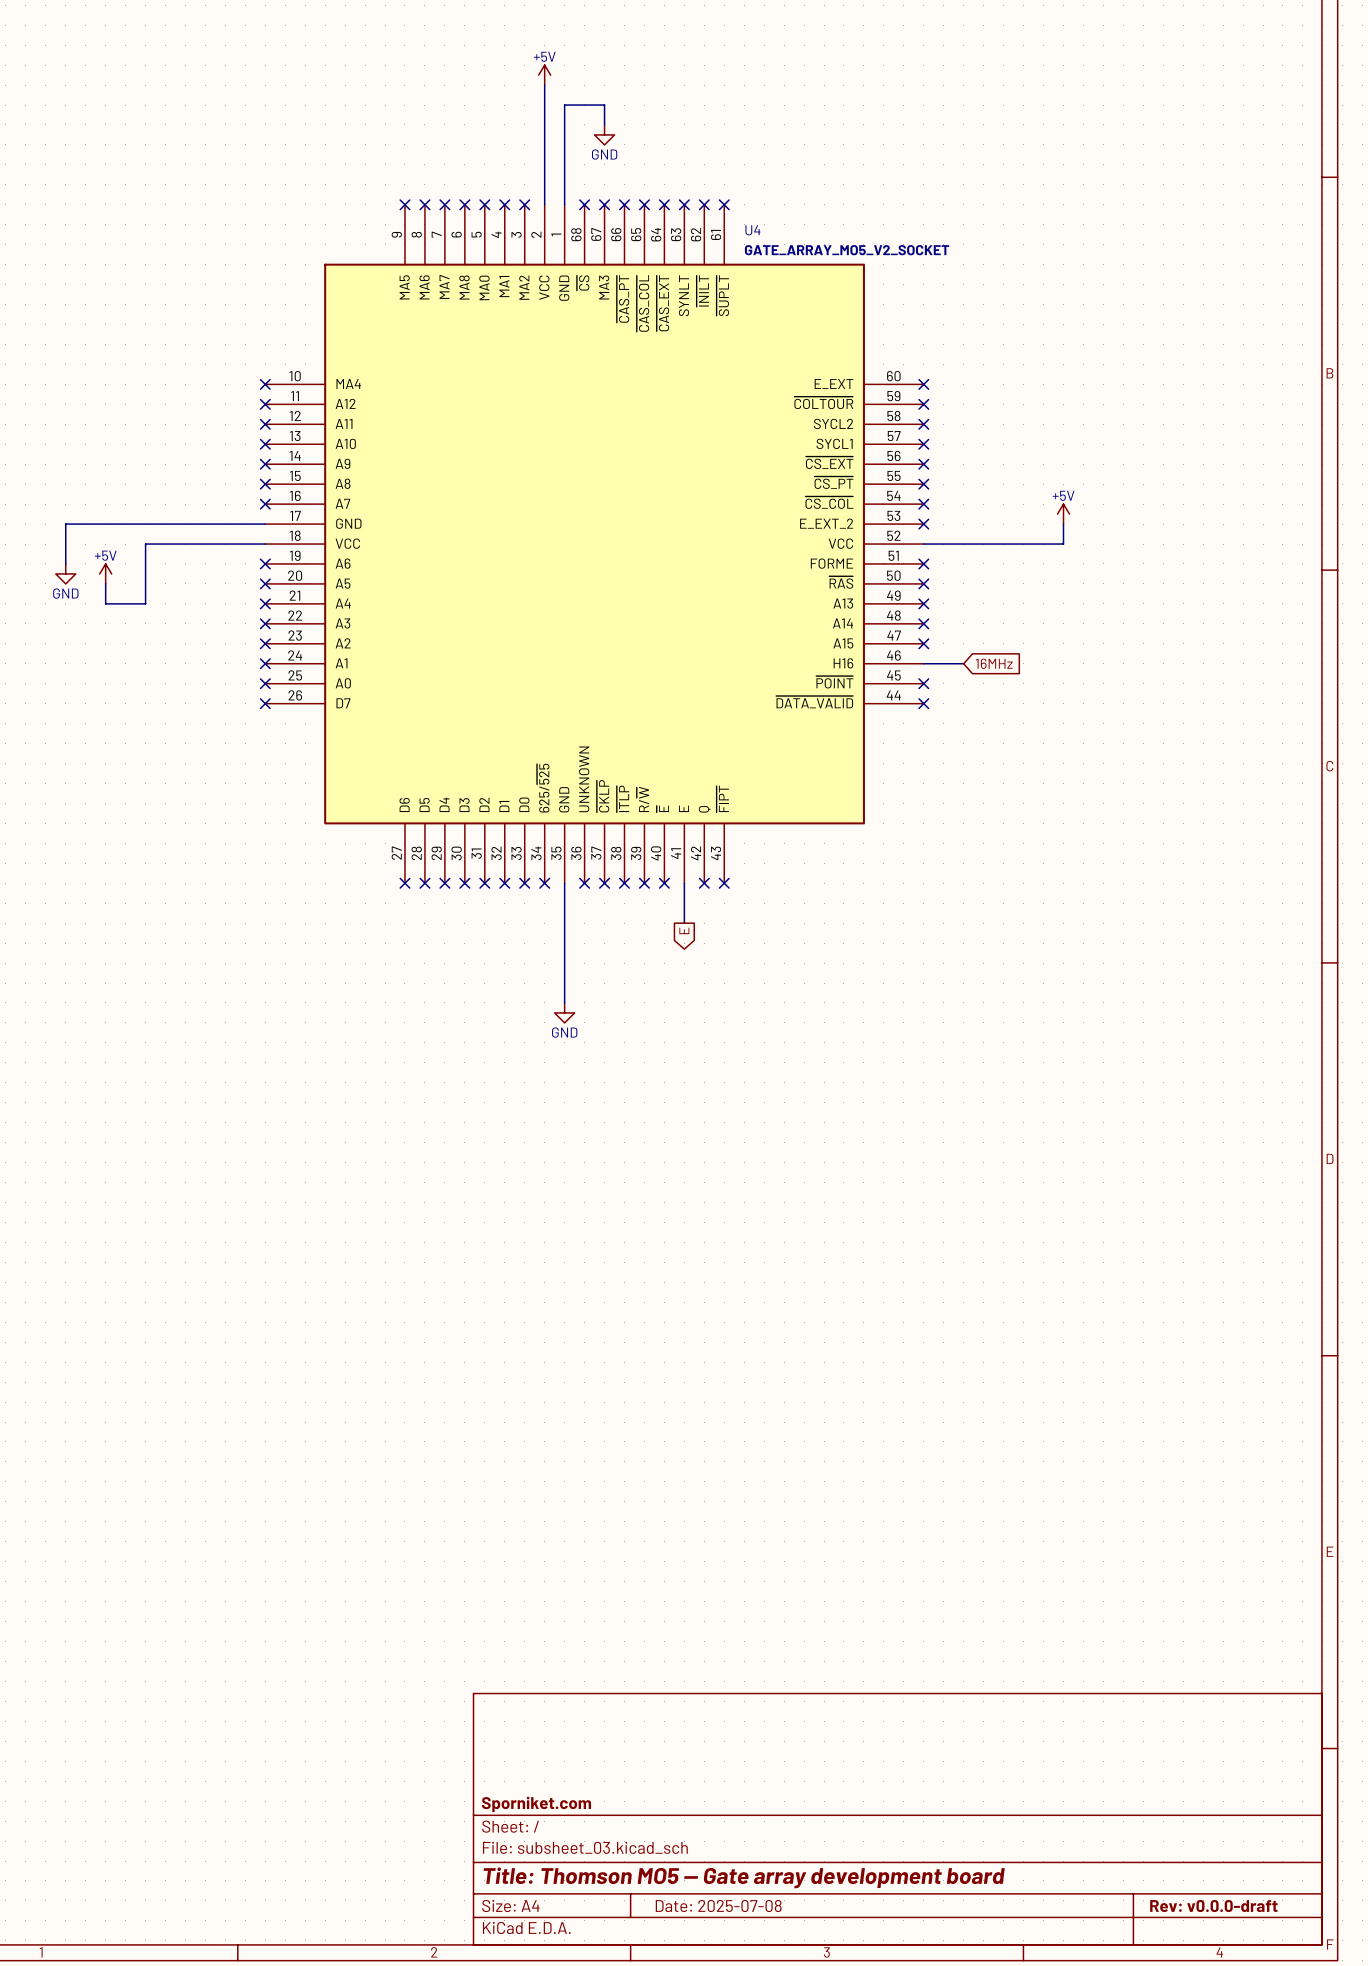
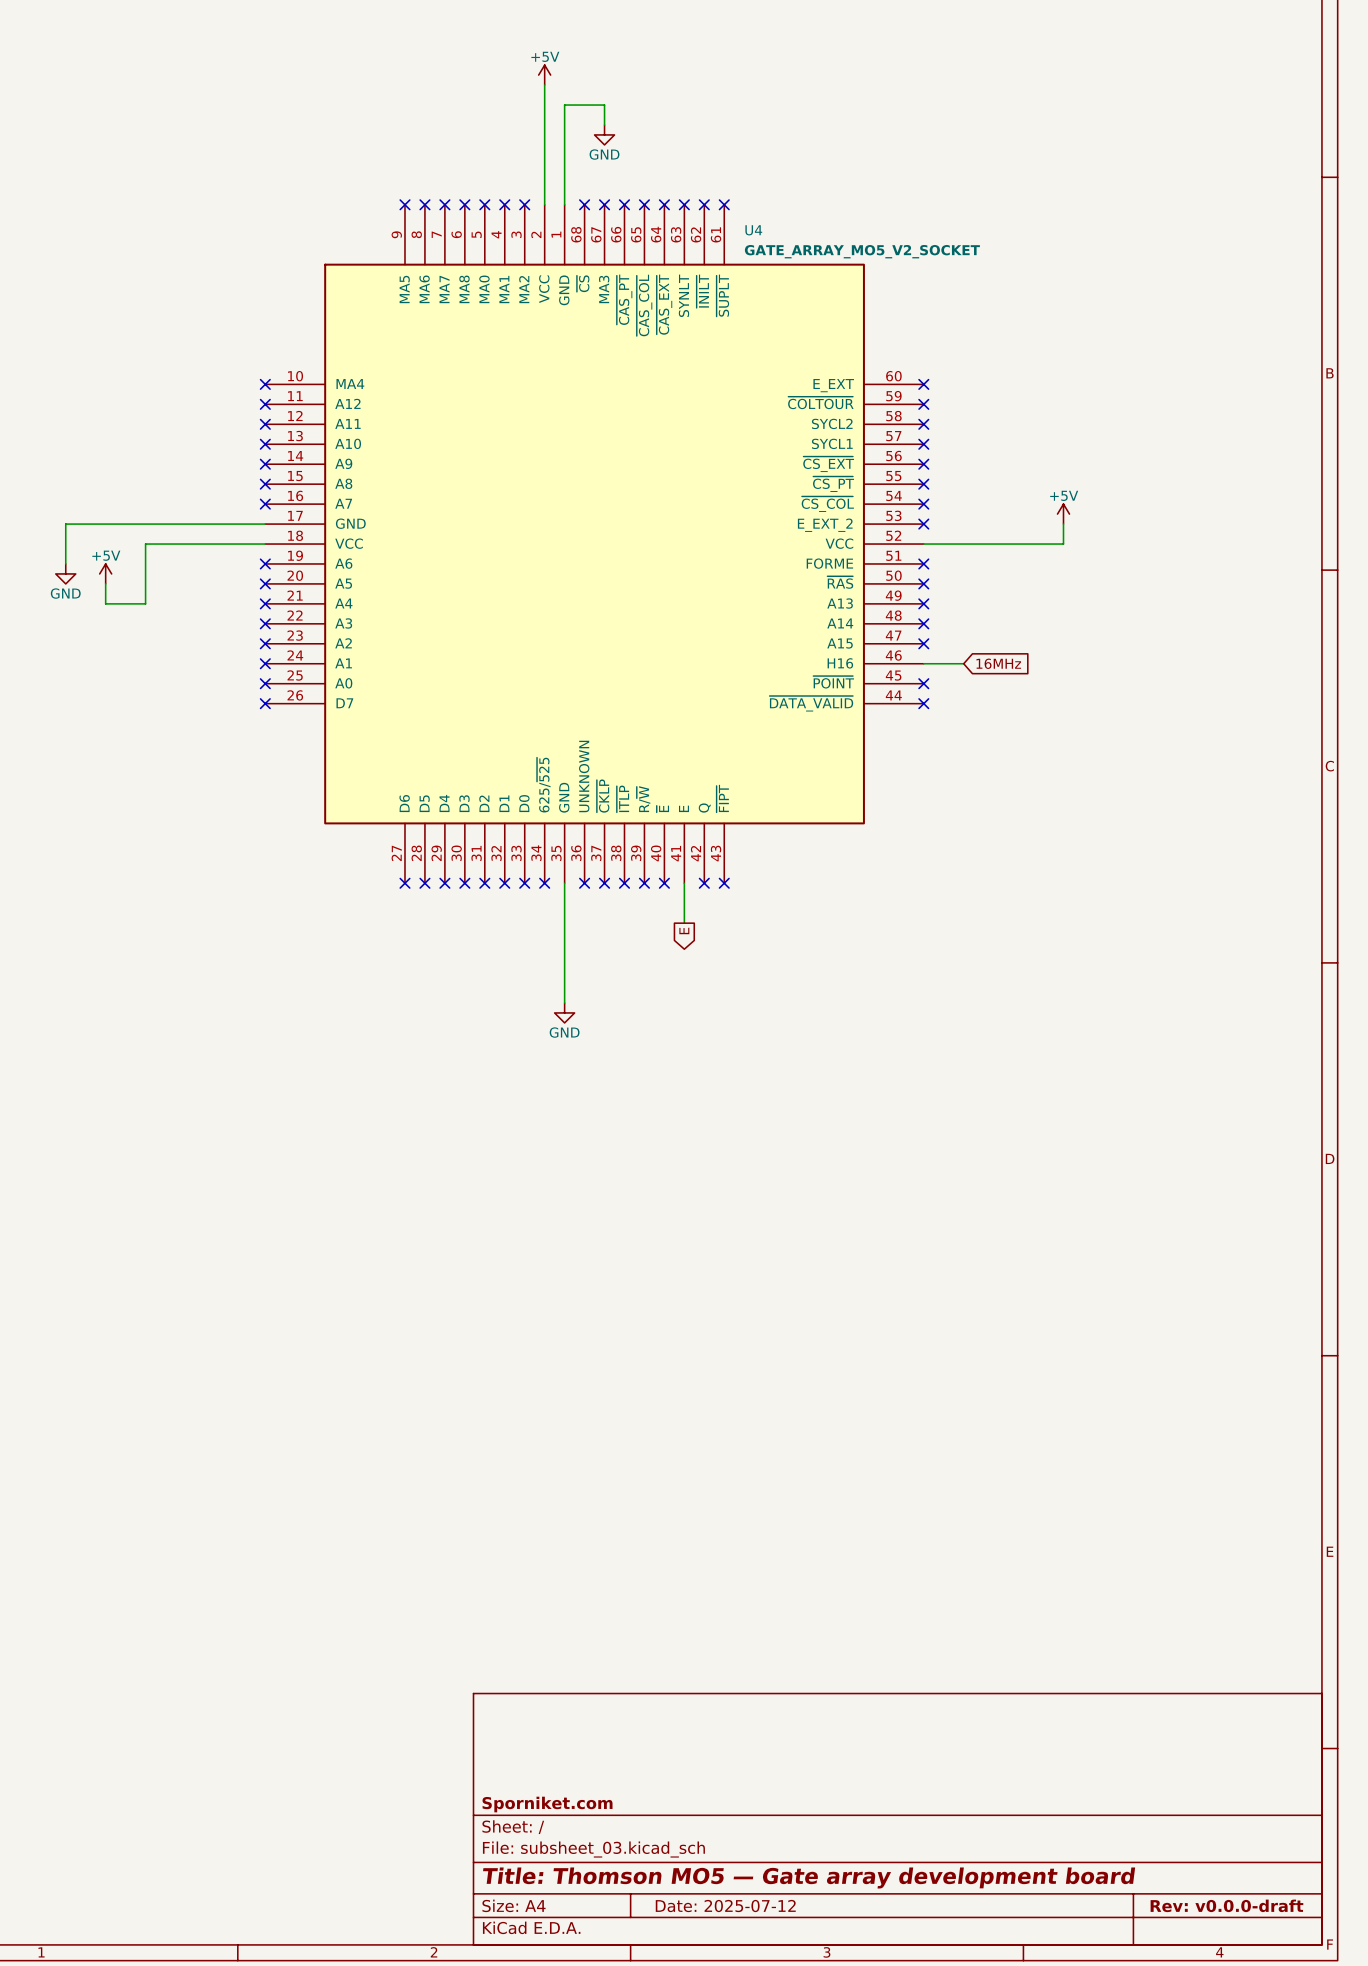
title block: Date: 2025-07-08 (718, 1906) -> Date: 2025-07-12 (725, 1906)

